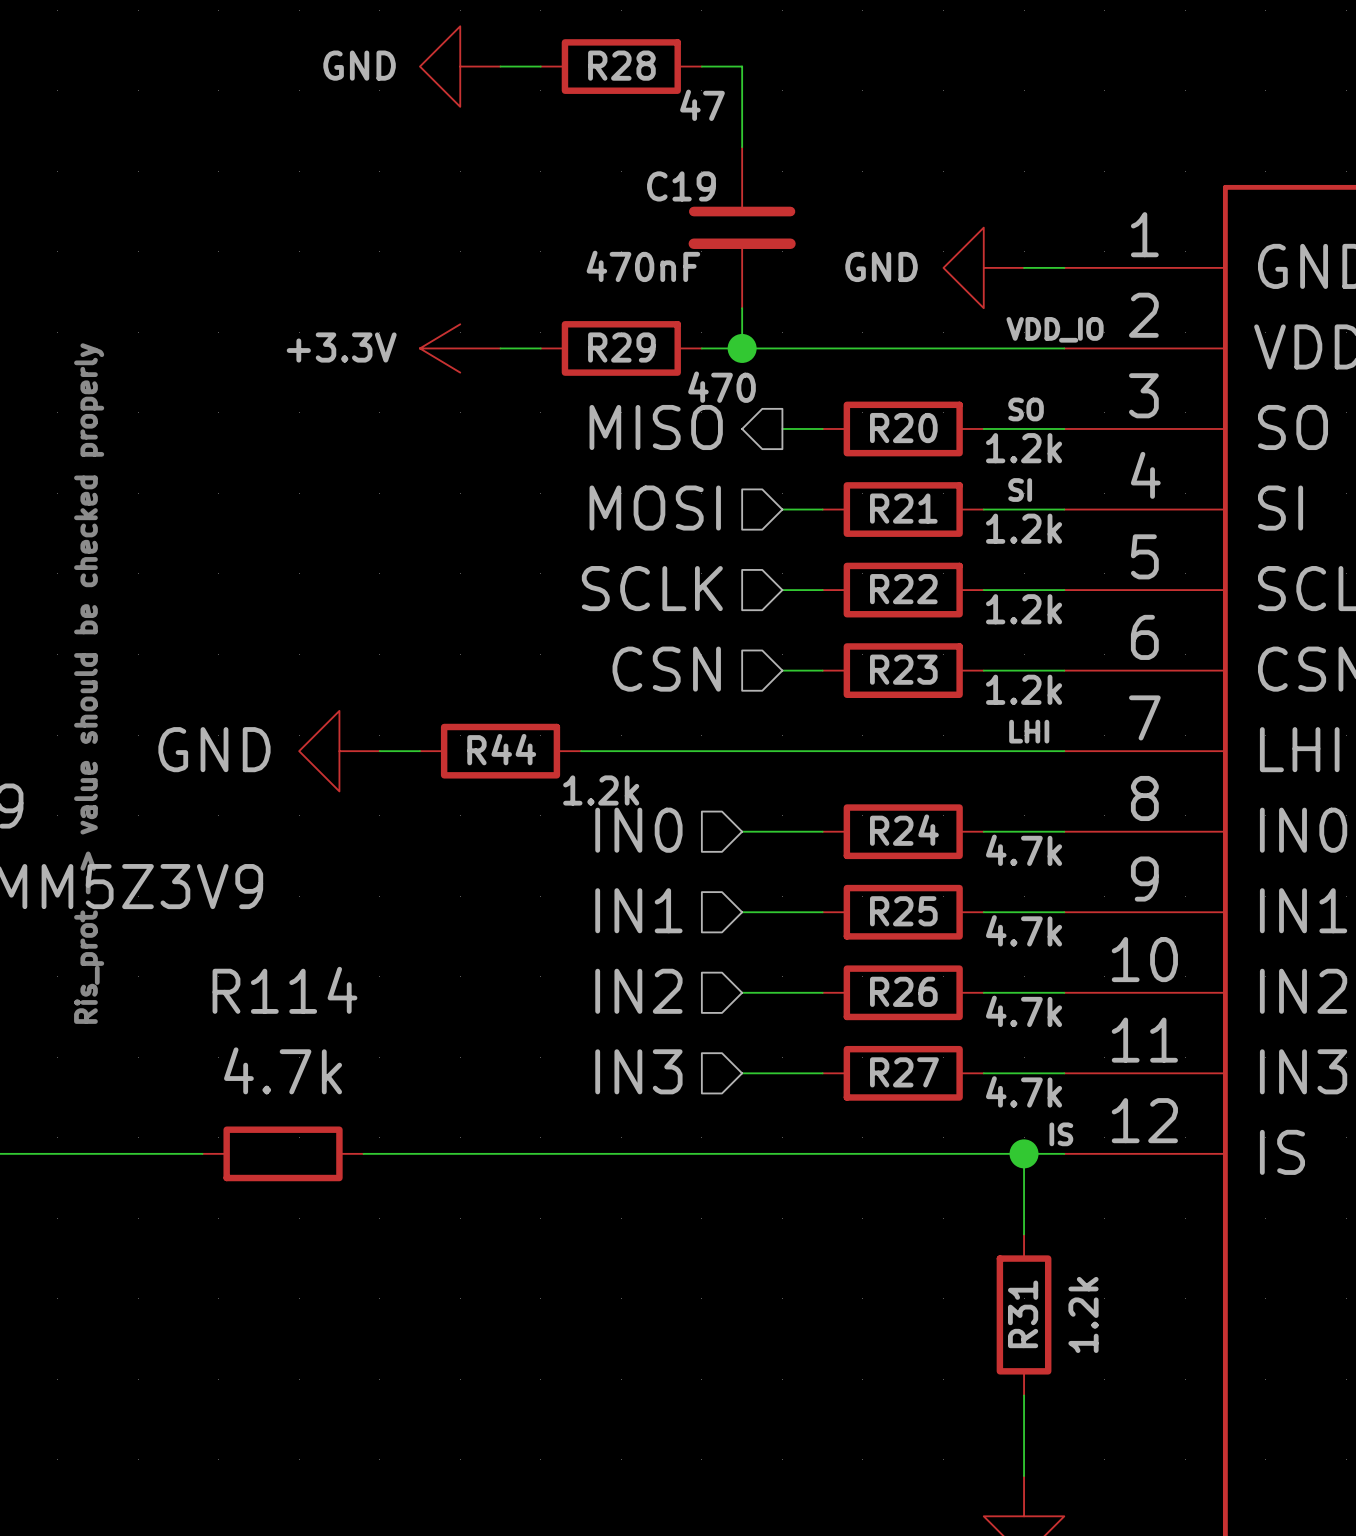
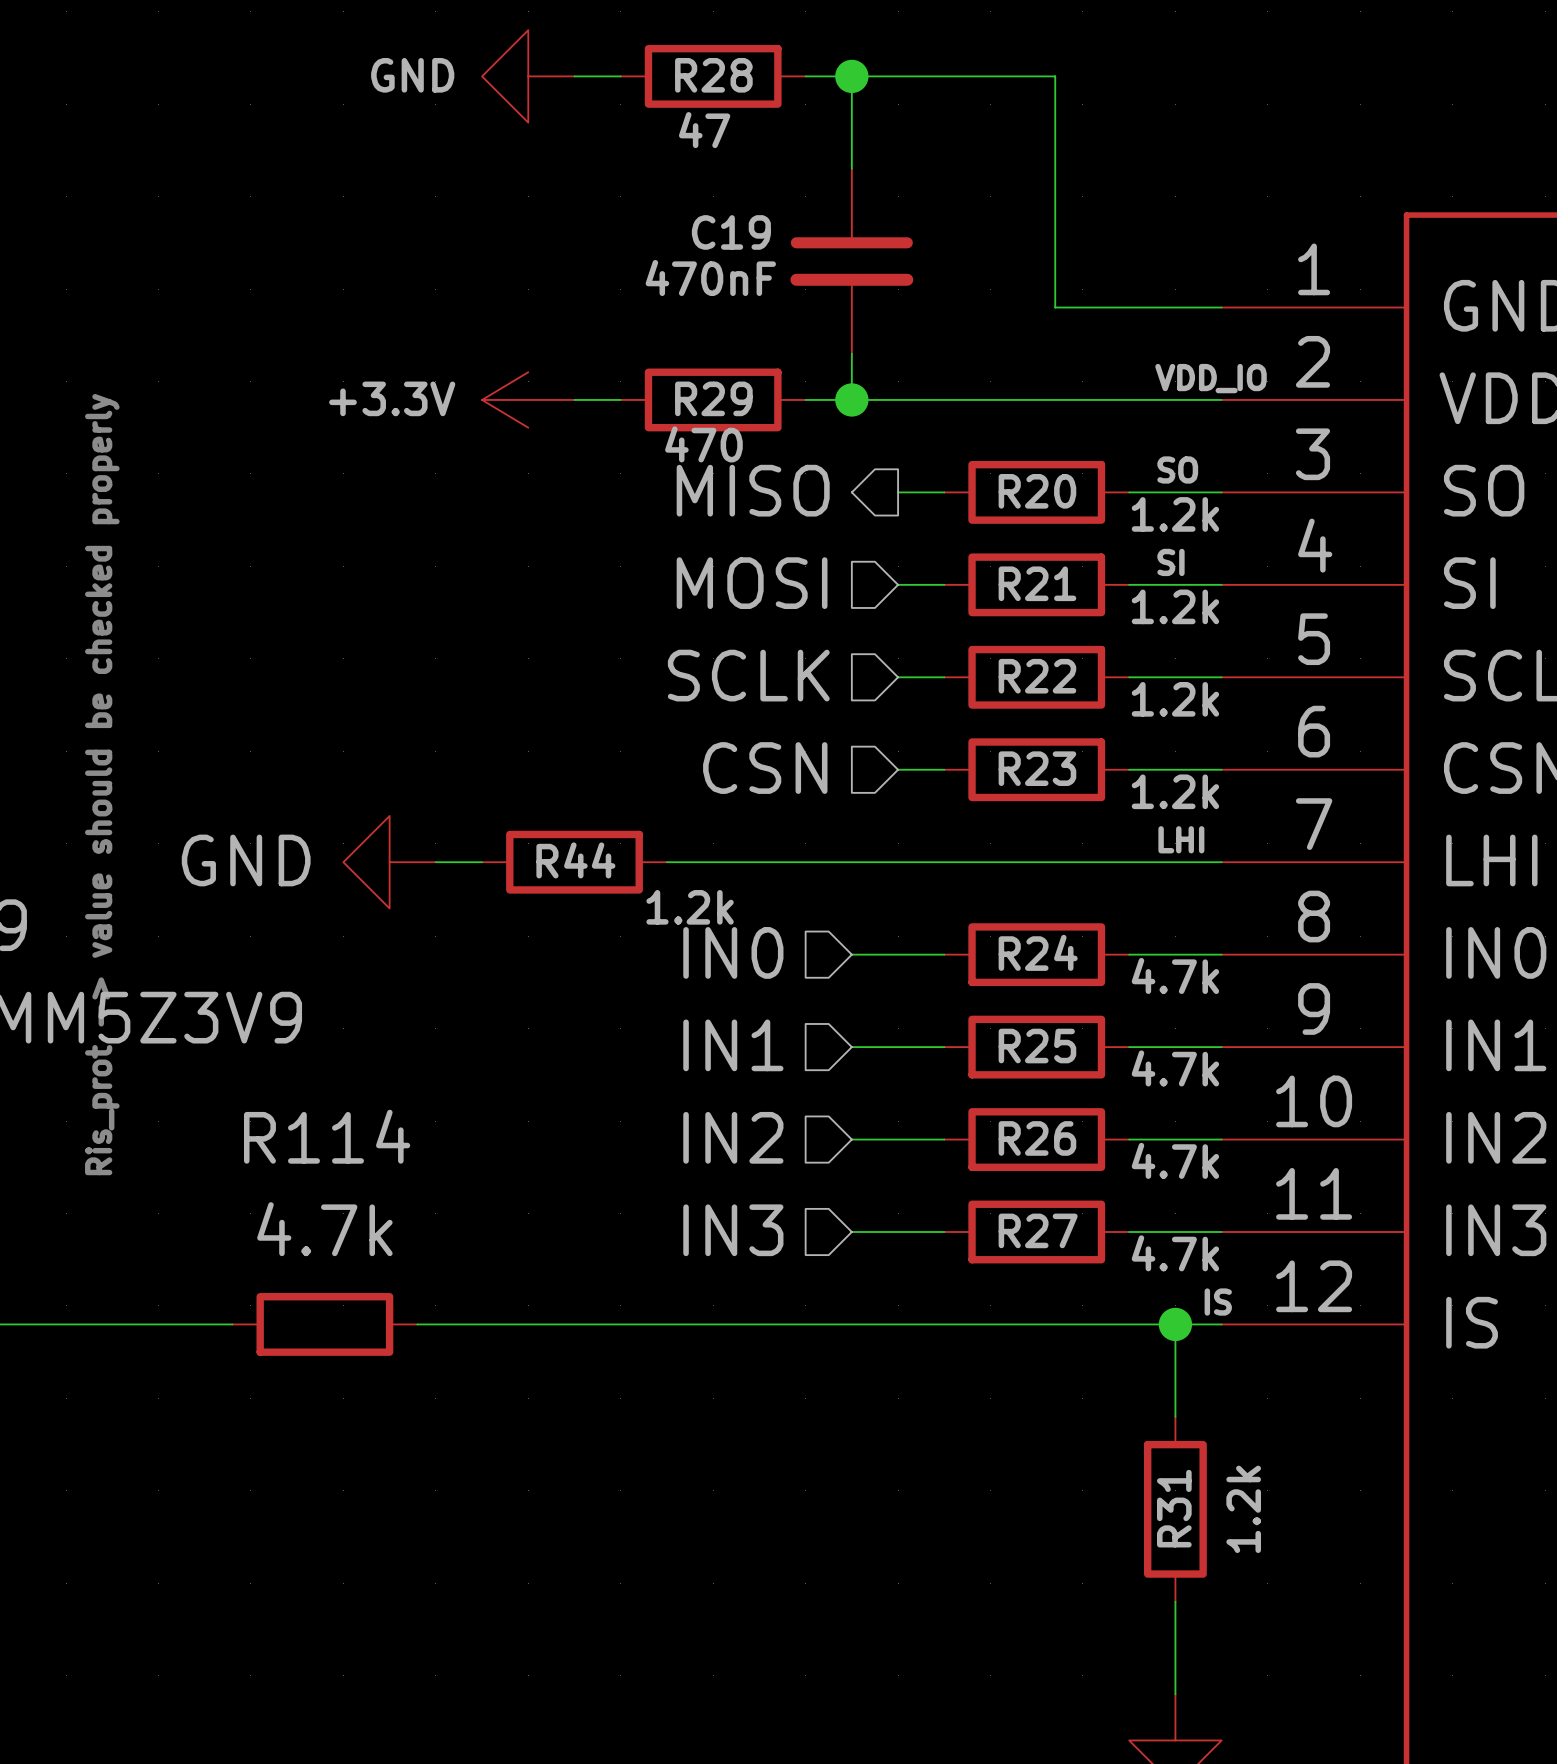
wire: none -> (851, 76) (1055, 76) (1055, 307) (1175, 307)
junction: none -> (851, 76)
R28 value position: 47 (702, 105) -> 47 (704, 130)
C19 name position: C19 (681, 186) -> C19 (731, 232)
C19 value position: 470nF (643, 266) -> 470nF (710, 278)
power symbol: GND (983, 267) -> none
R29 value position: 470 (722, 387) -> 470 (703, 444)

